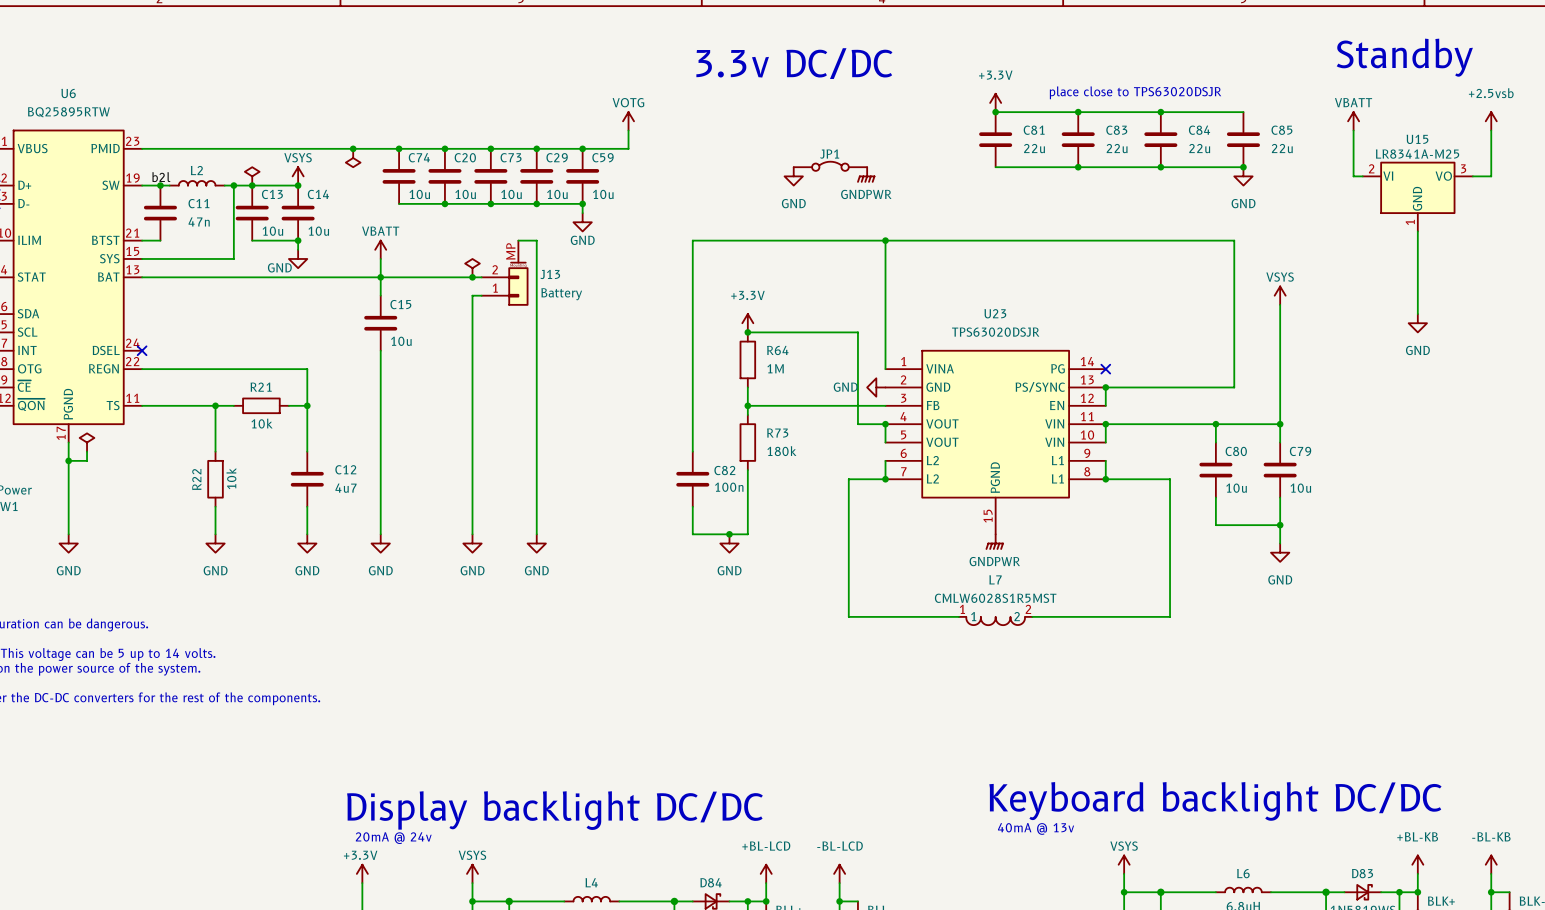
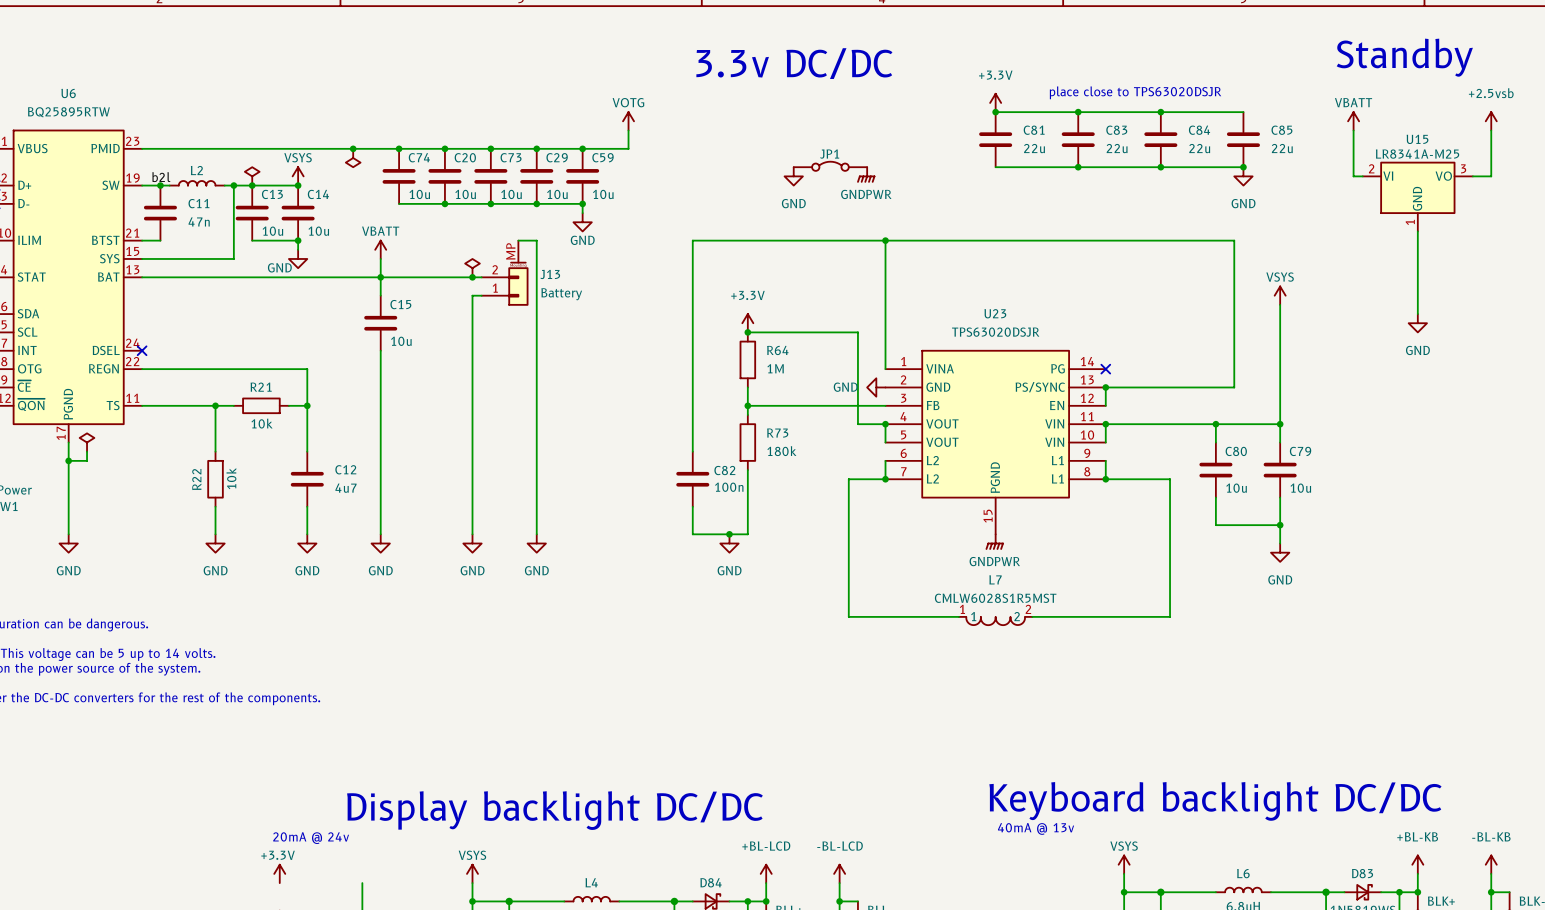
text position: 20mA @ 24v (393, 838) -> 20mA @ 24v (311, 838)
power symbol position: +3.3V (362, 873) -> +3.3V (279, 873)

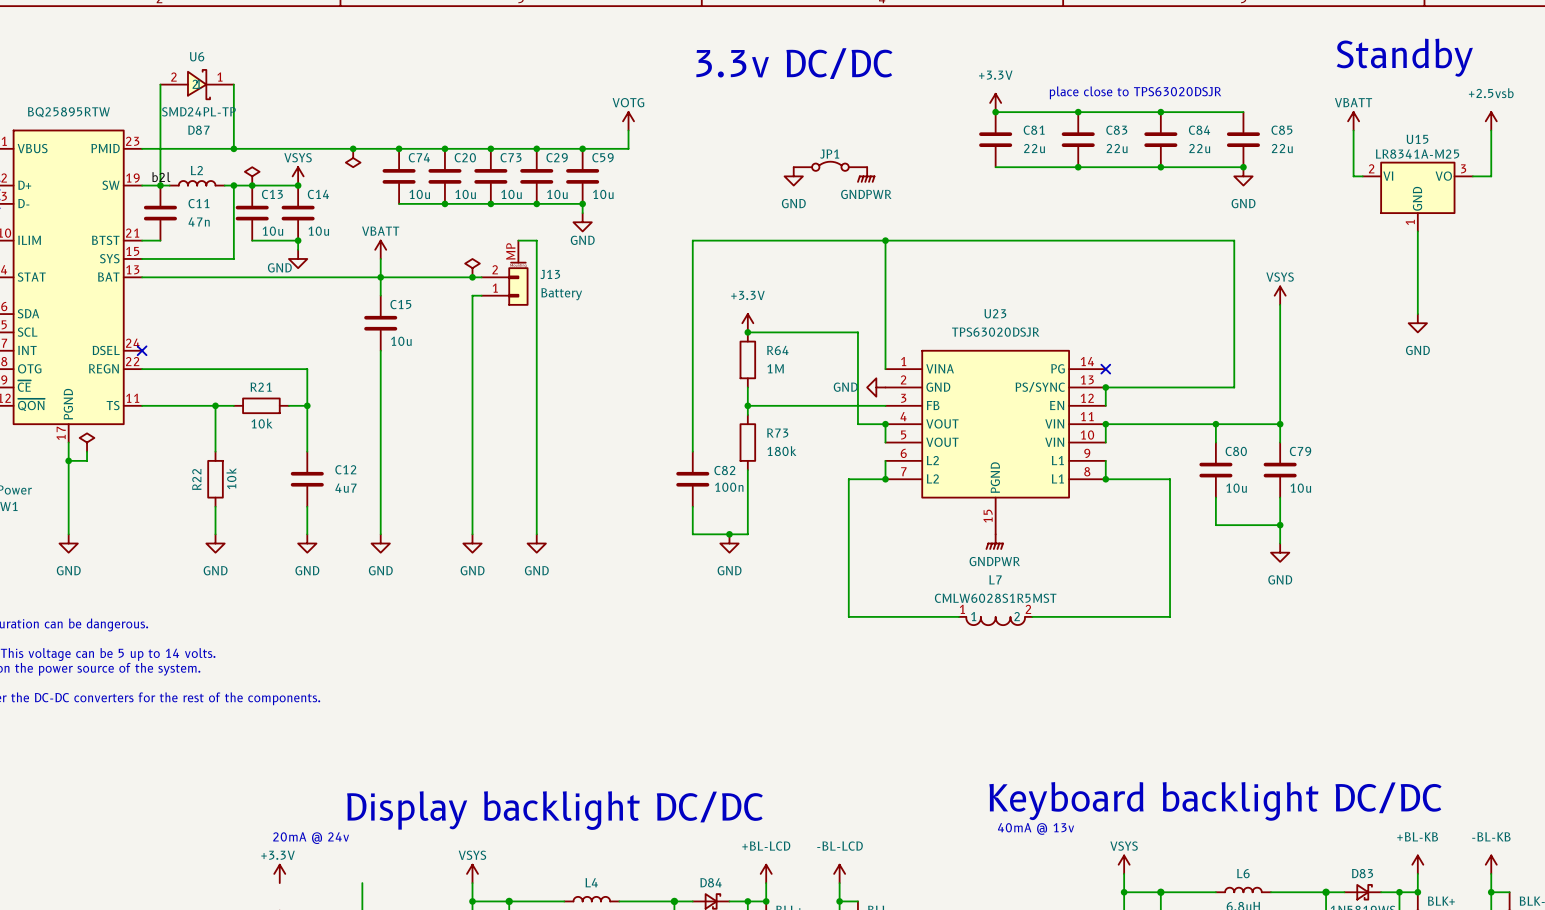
wire: none -> (160, 84) (160, 185)
D87: none -> SMD24PL-TP (197, 84)
wire: none -> (233, 84) (233, 148)
U6 name position: U6 (68, 93) -> U6 (197, 56)
junction: none -> (233, 148)

